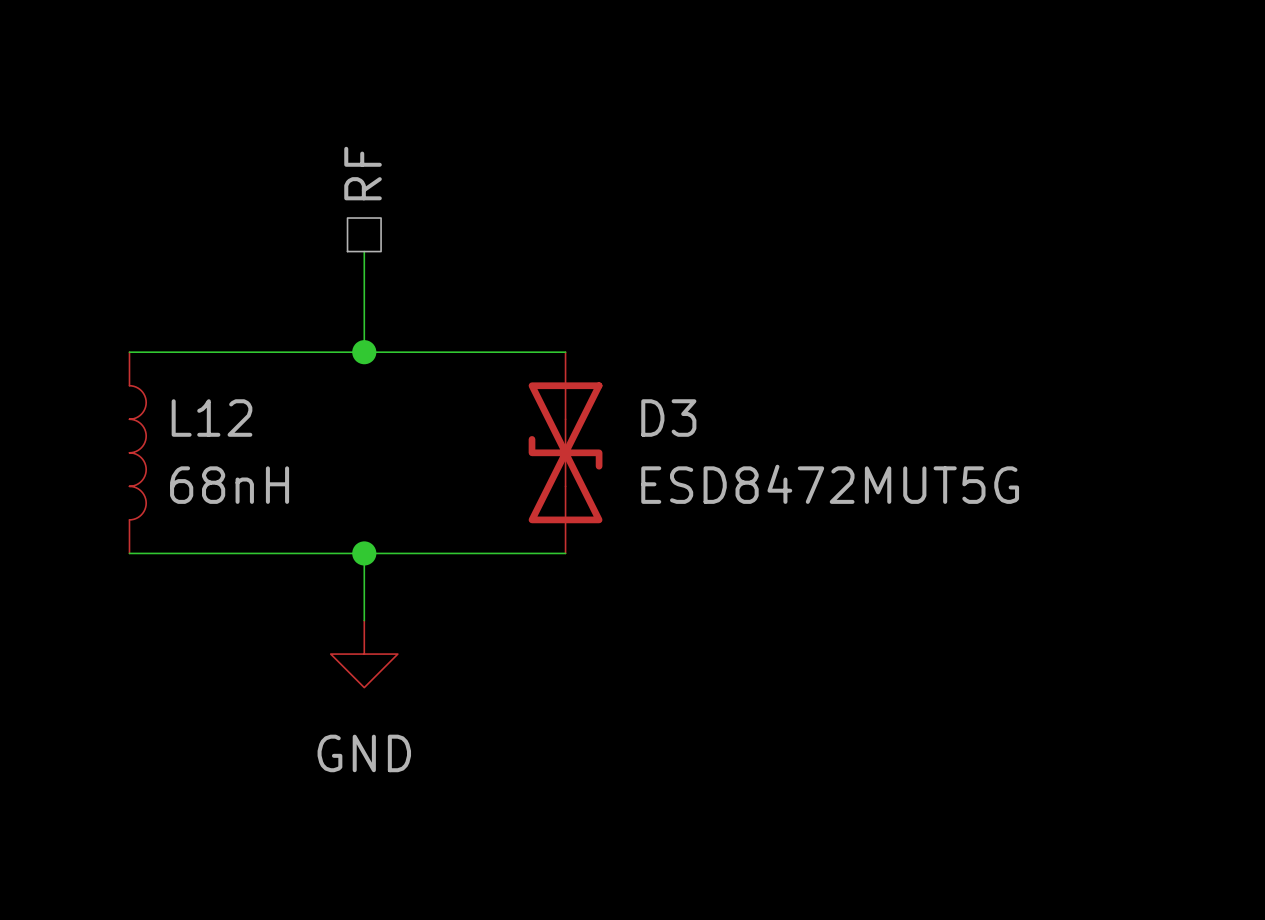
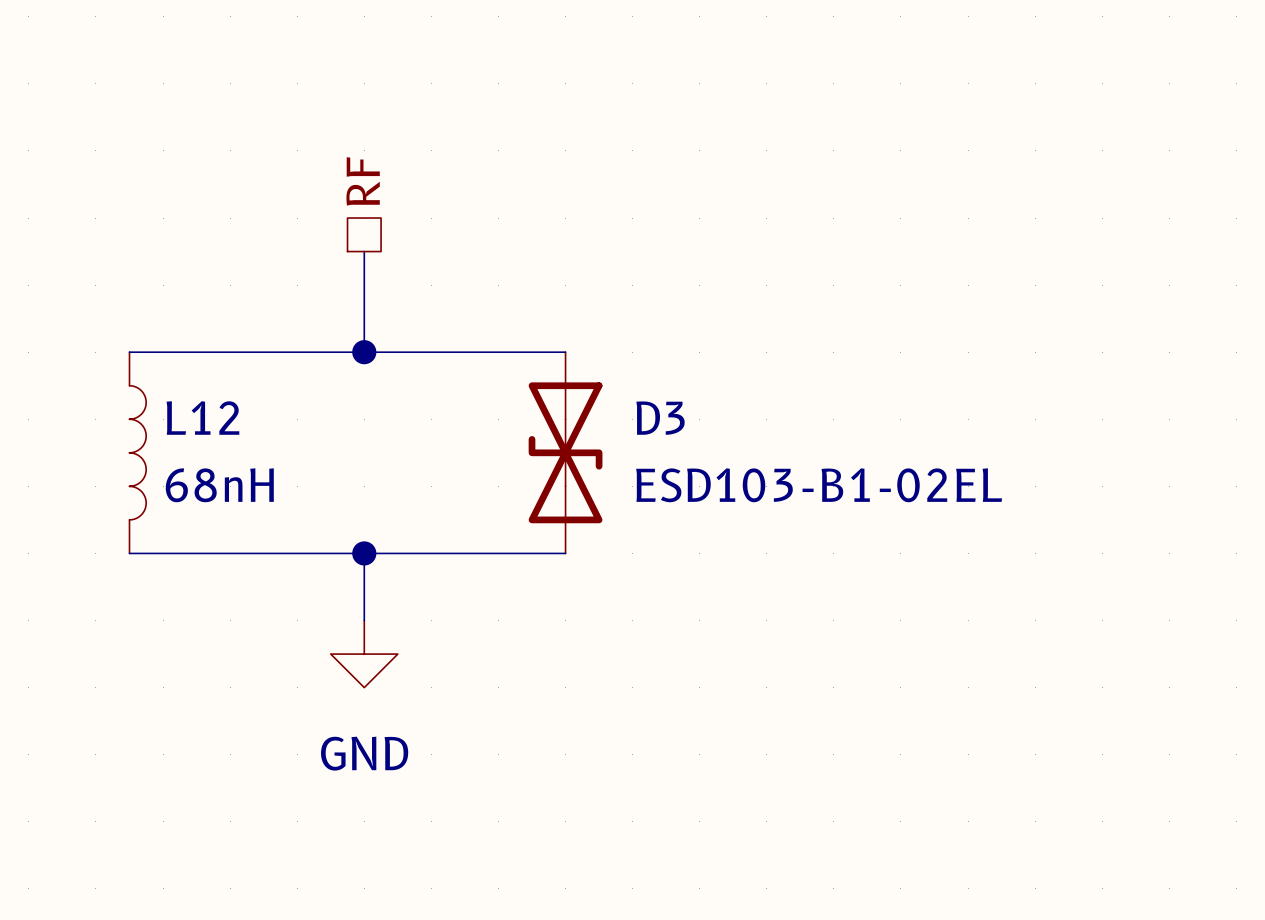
D3 value: ESD8472MUT5G (830, 484) -> ESD103-B1-02EL (819, 485)

